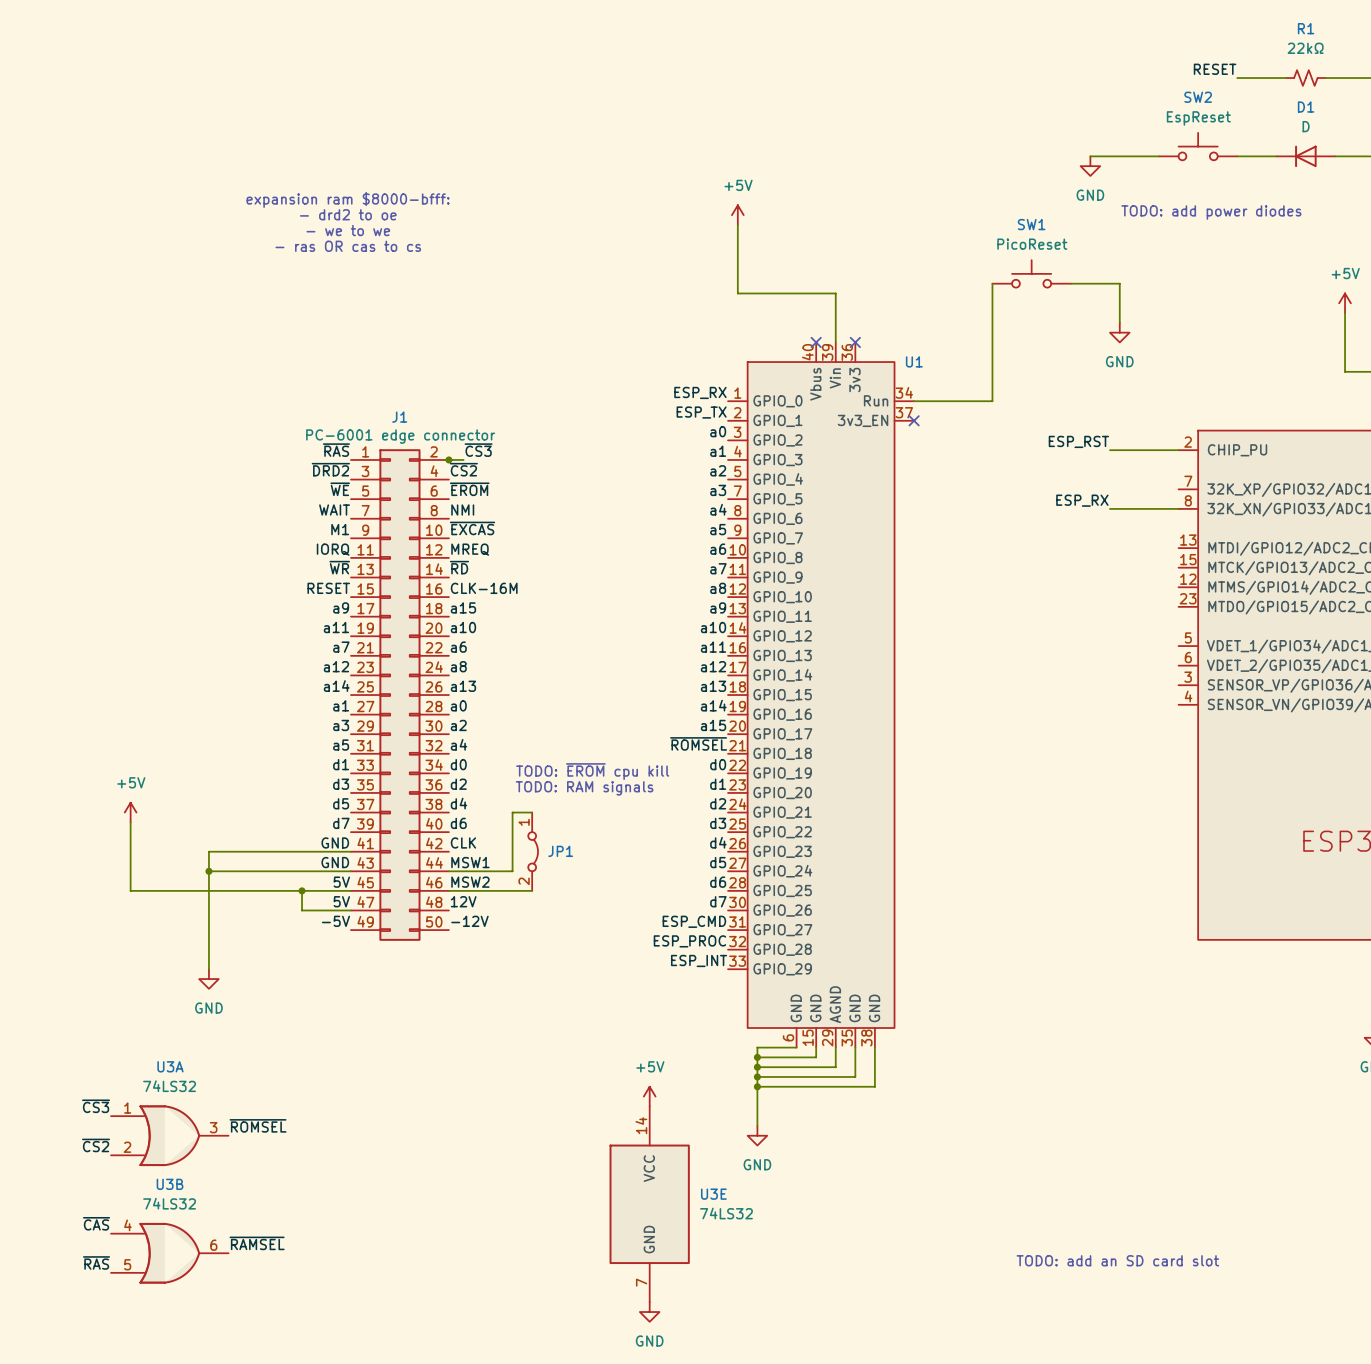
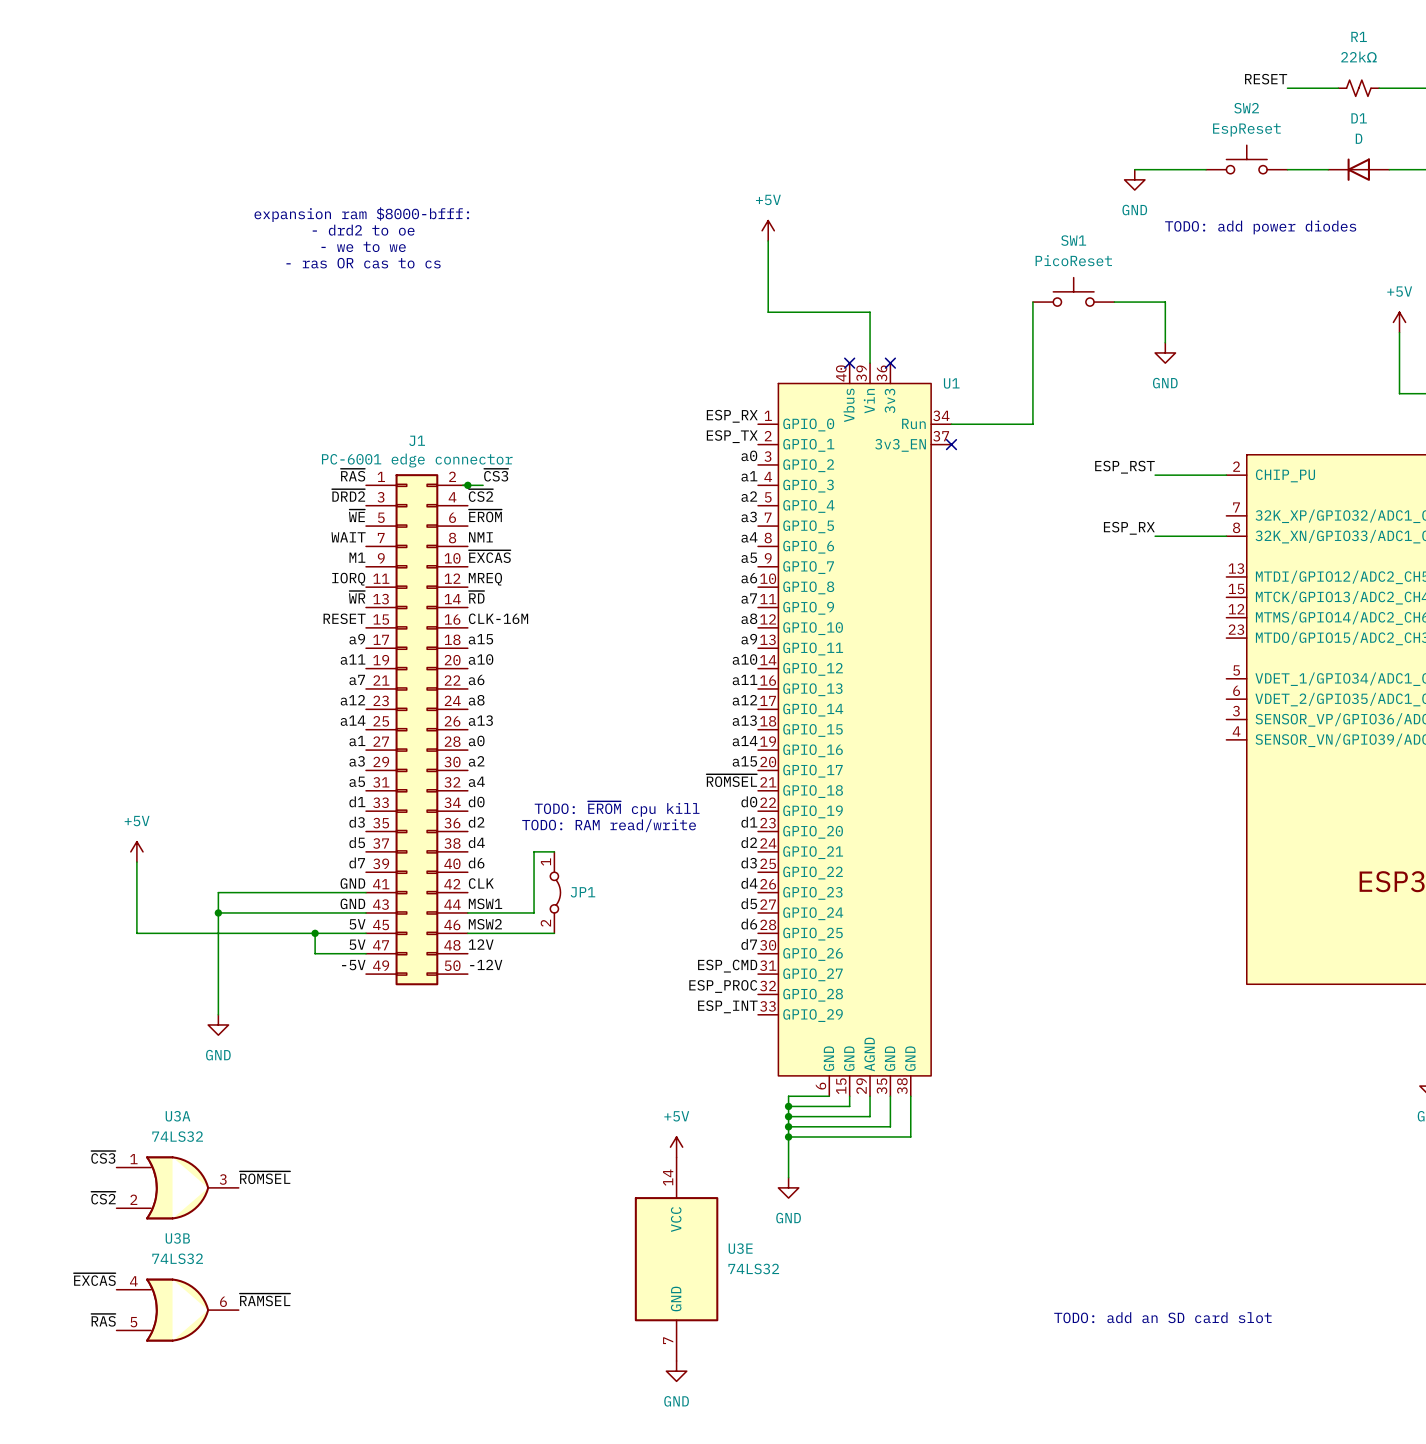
text: TODO: RAM signals (584, 788) -> TODO: RAM read/write (609, 825)
label: ~{CAS} (96, 1223) -> ~{EXCAS} (94, 1279)

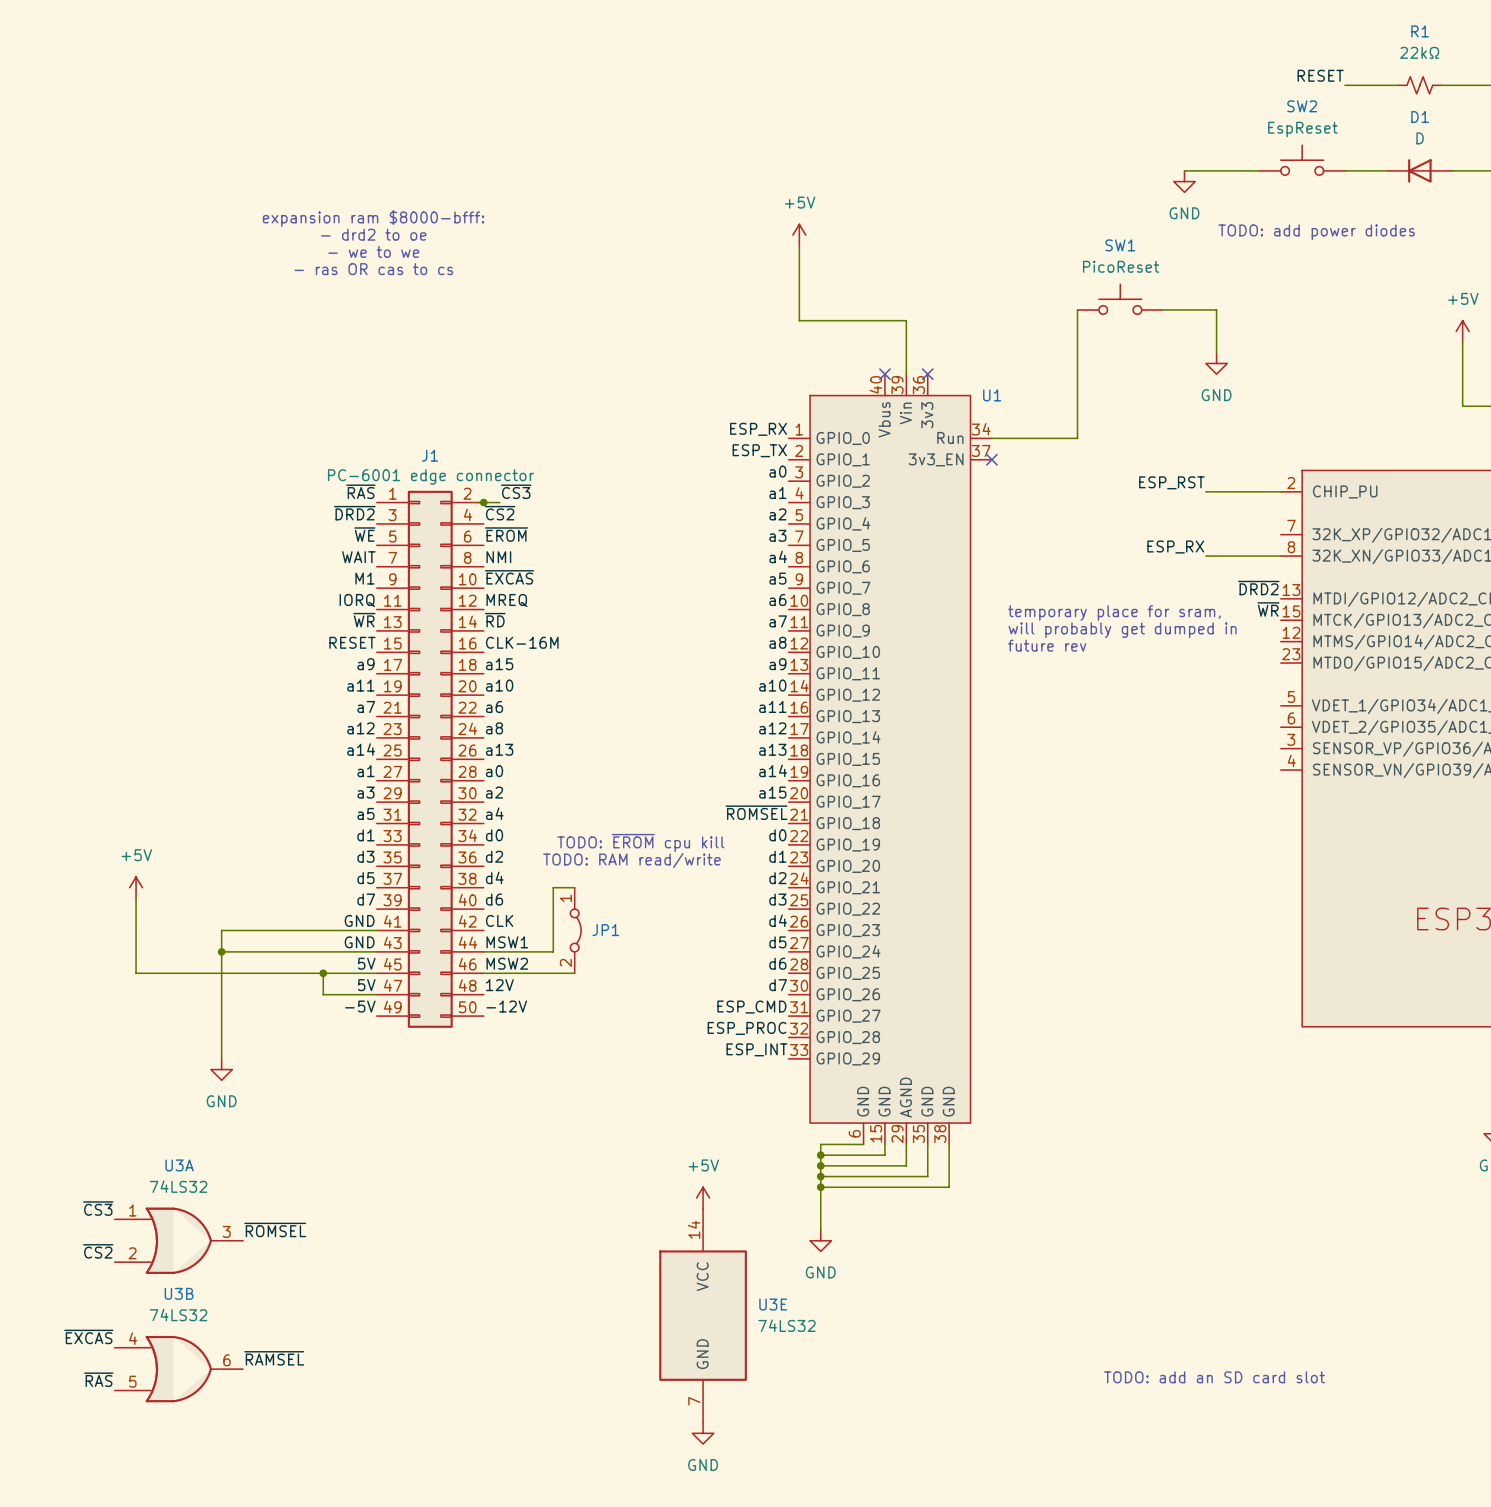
label: none -> ~{DRD2} (1258, 588)
label: none -> ~{WR} (1268, 609)
text: none -> temporary place for sram, (1114, 612)
text: none -> will probably get dumped in (1122, 630)
text: none -> future rev (1047, 645)

